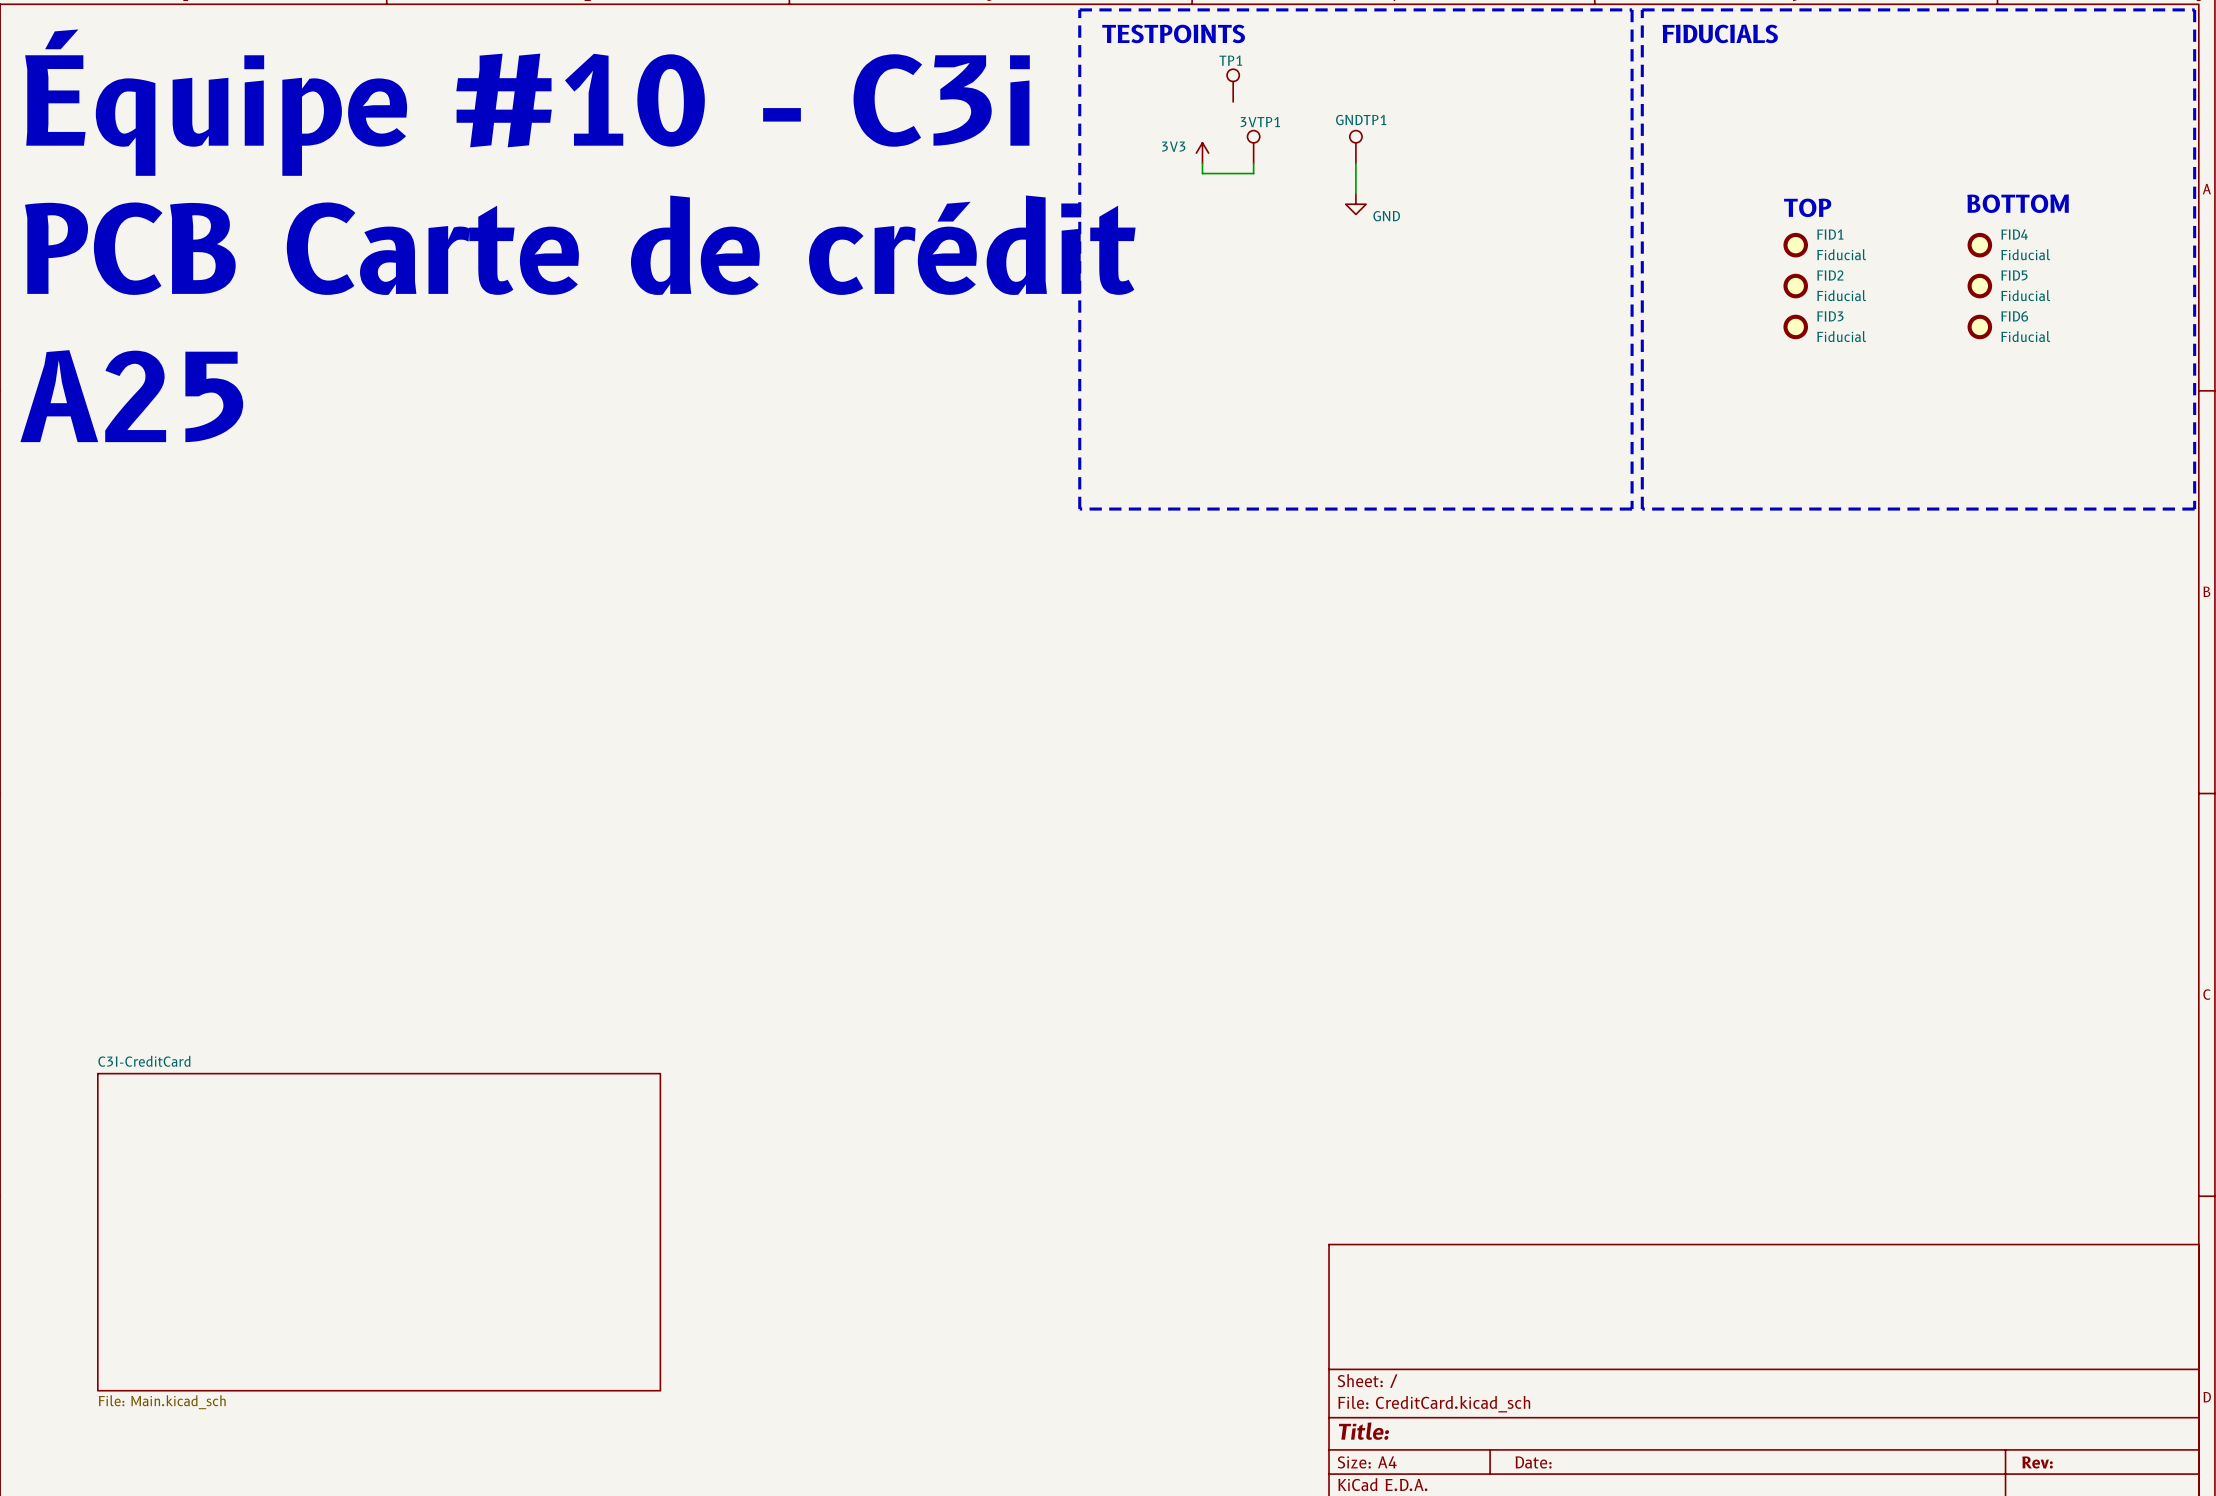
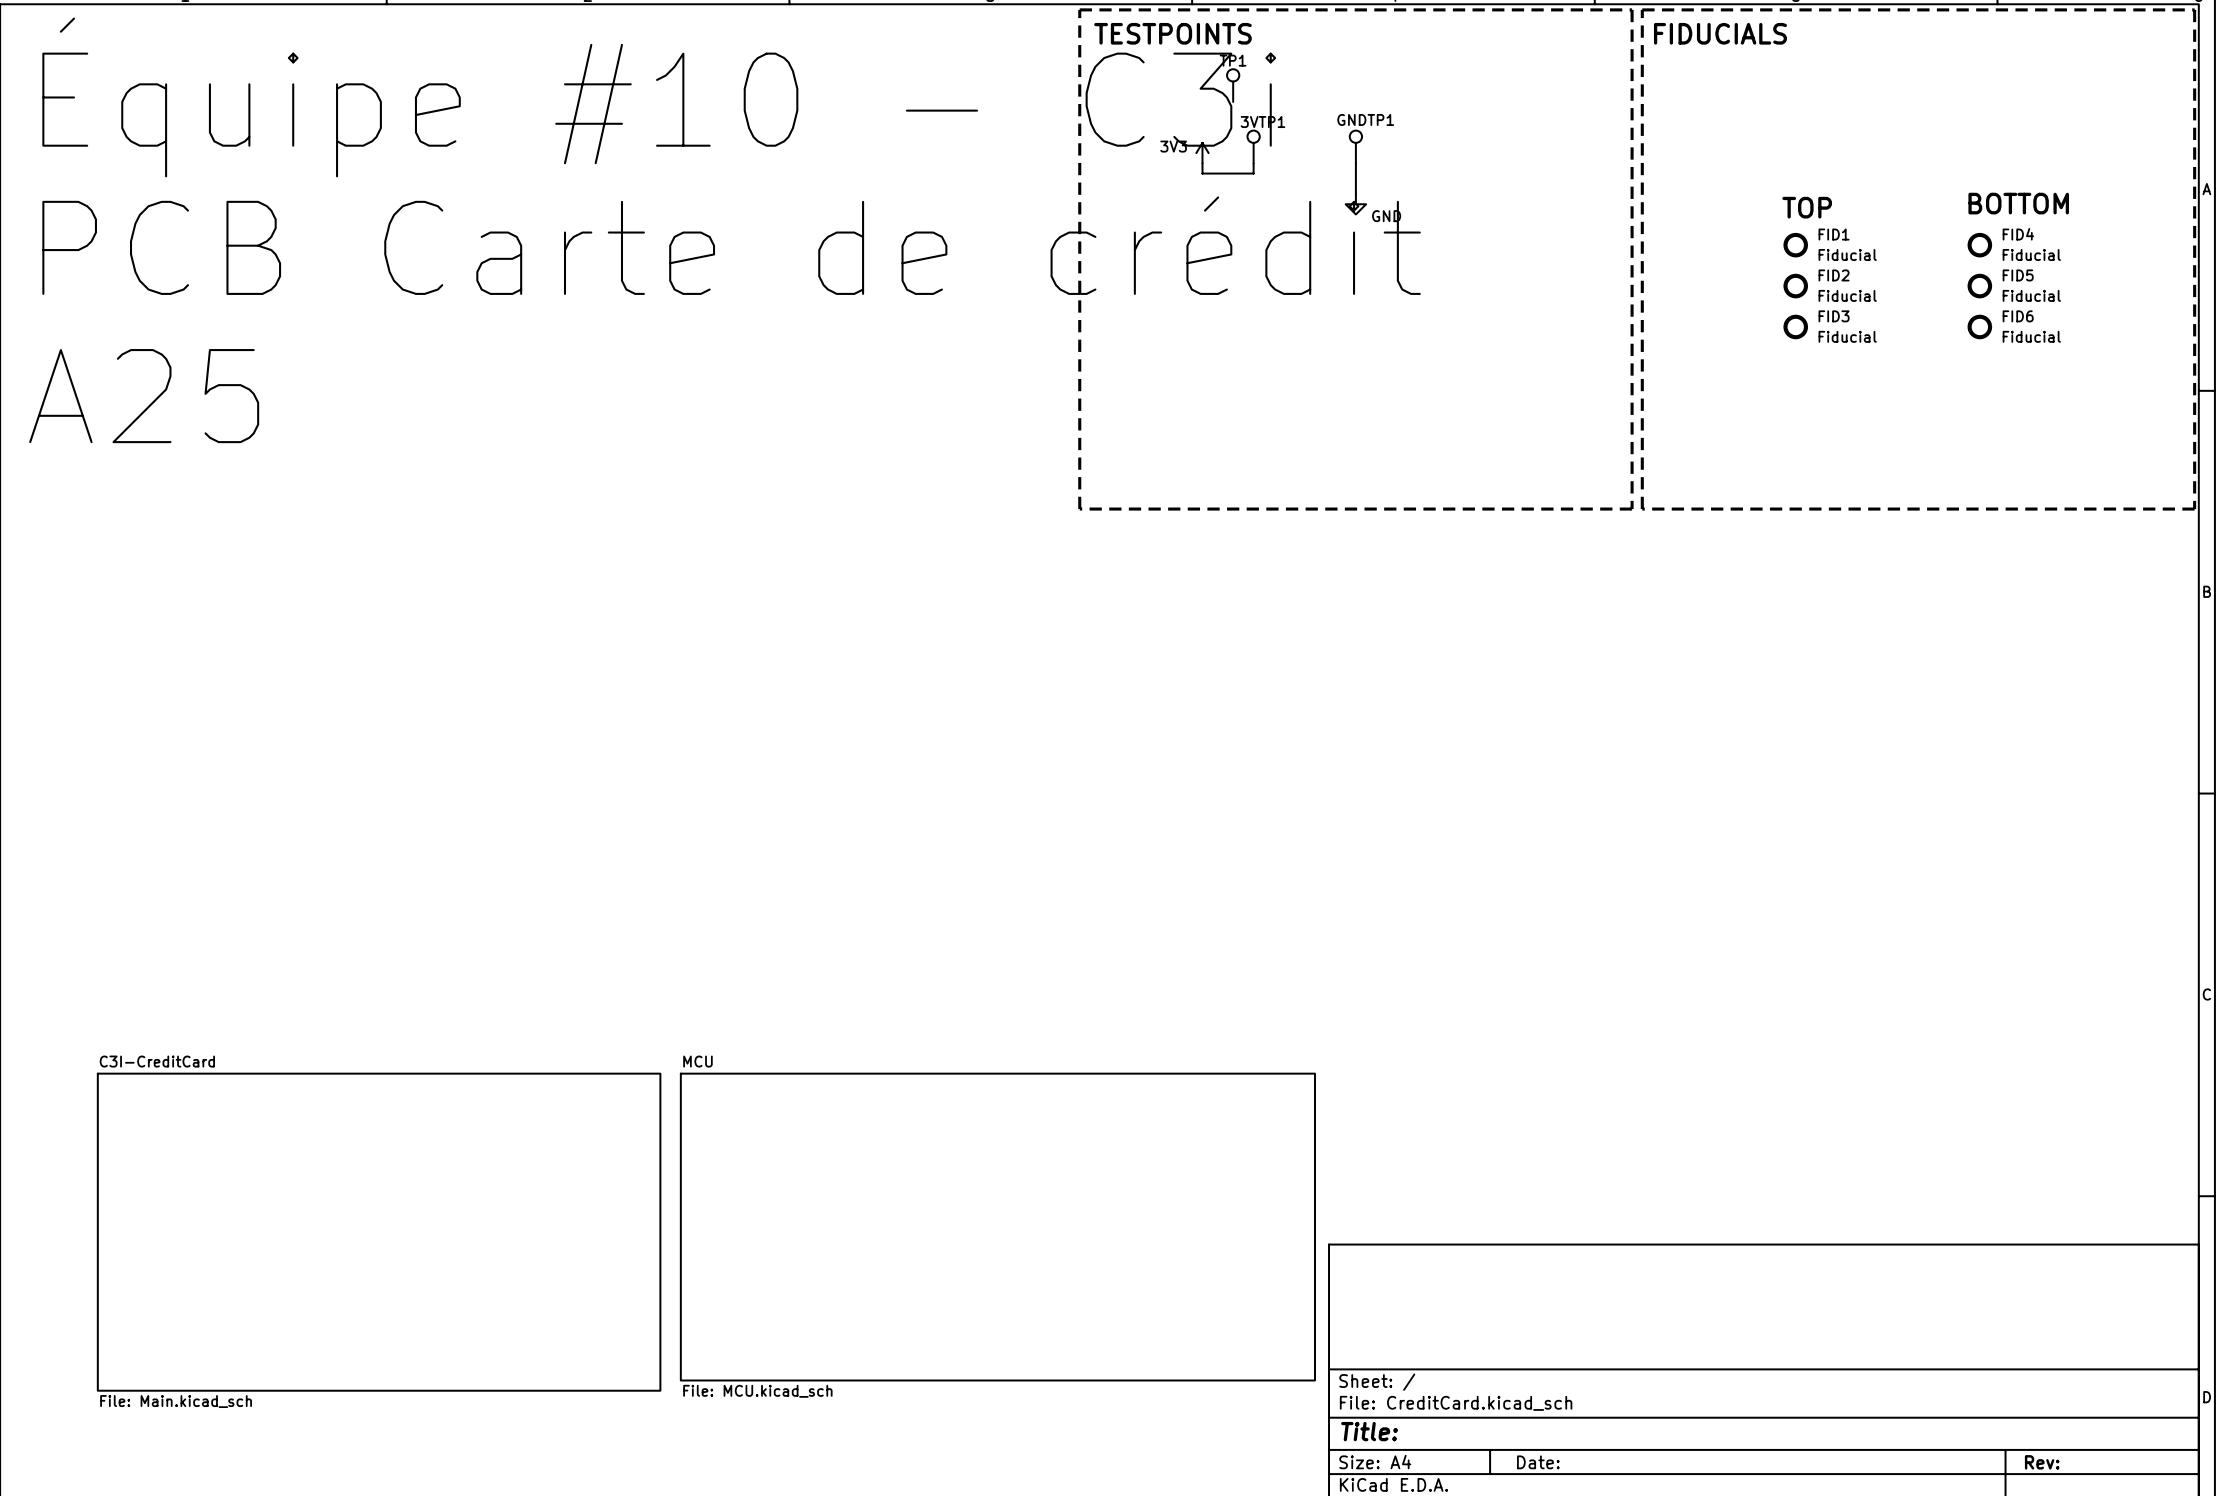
sheet MCU: none -> File: MCU.kicad_sch (997, 1227)

